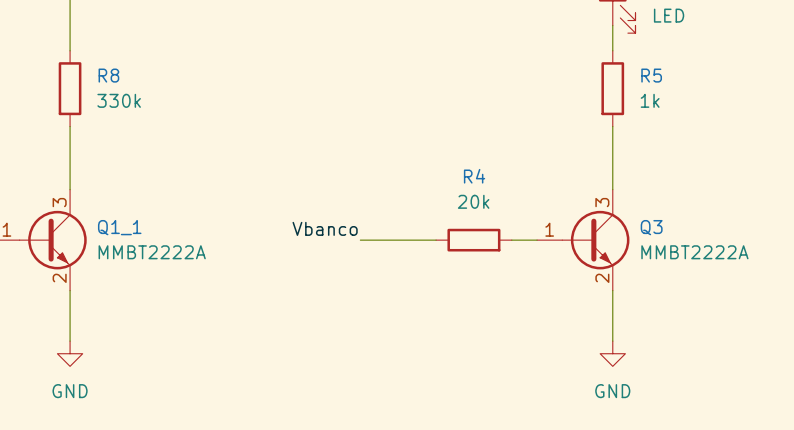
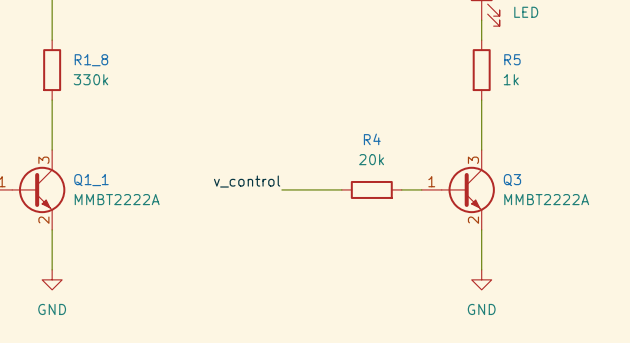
R8 name: R8 (108, 75) -> R1_8 (91, 60)
label: Vbanco (325, 228) -> v_control (247, 181)

